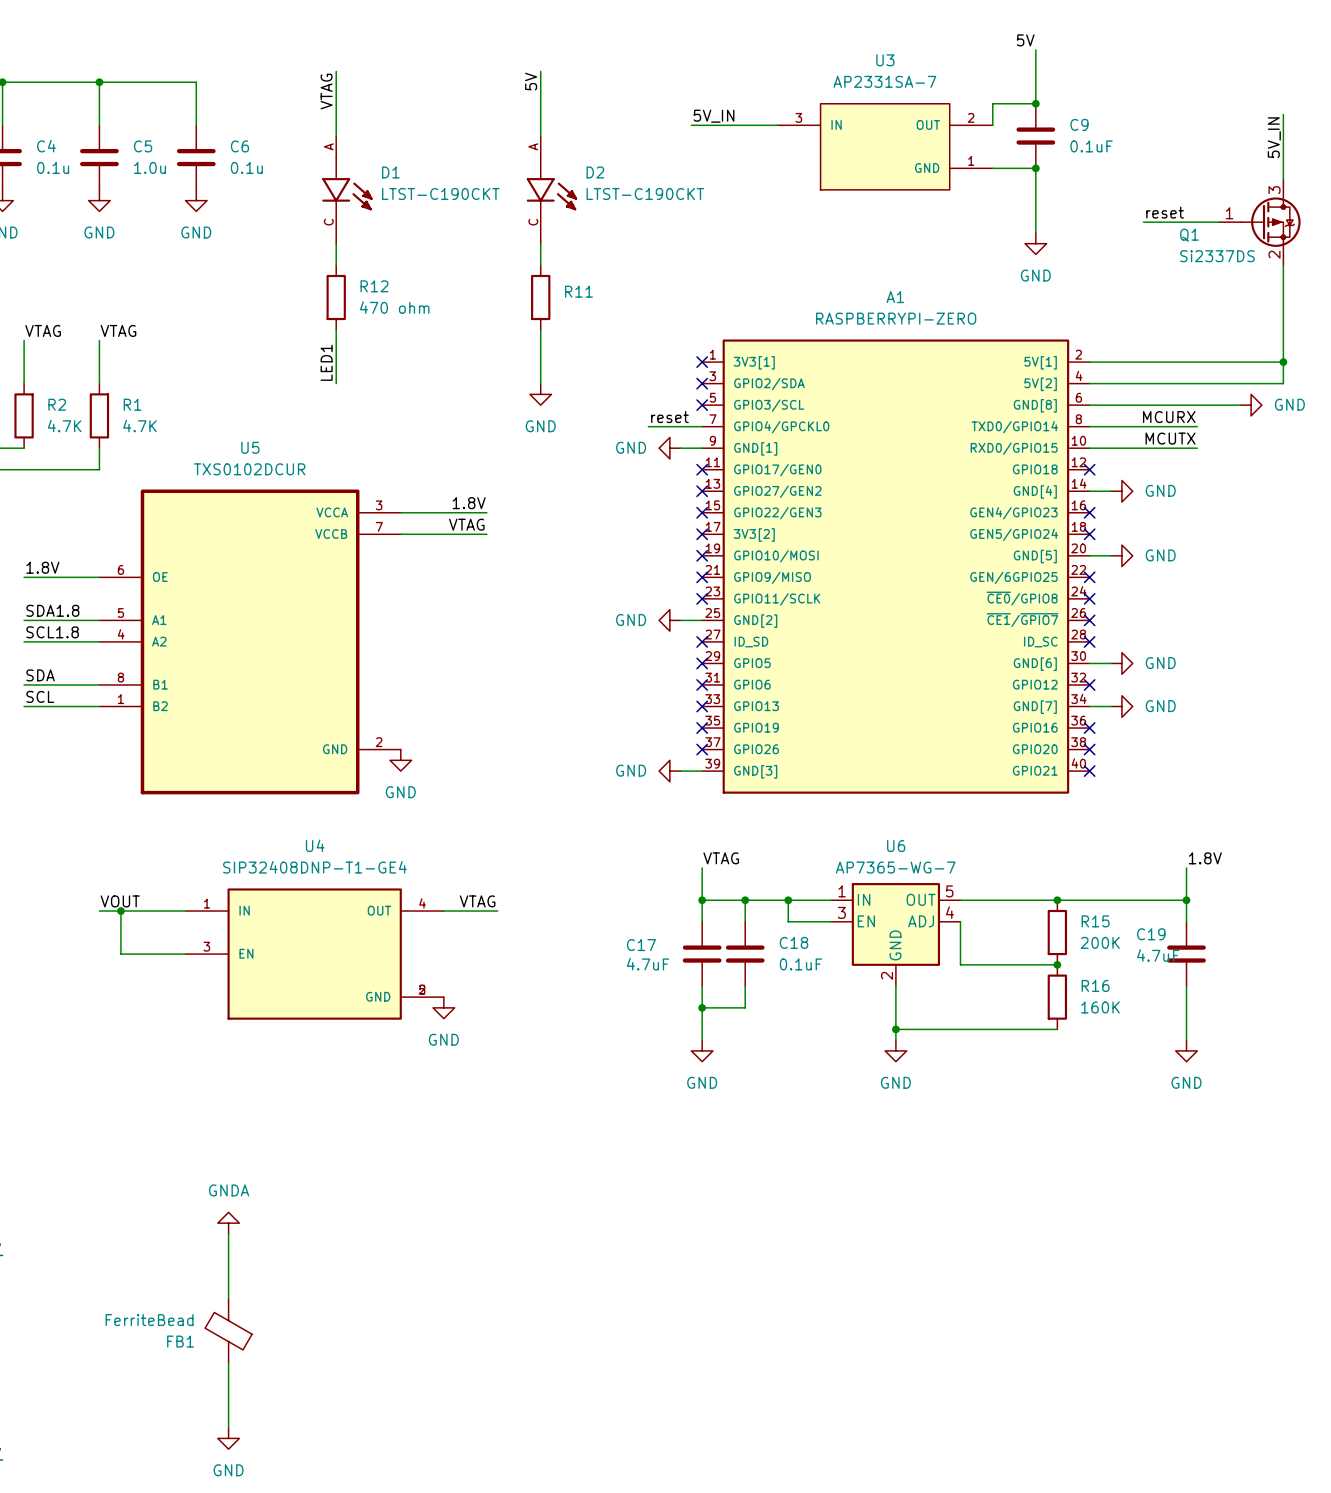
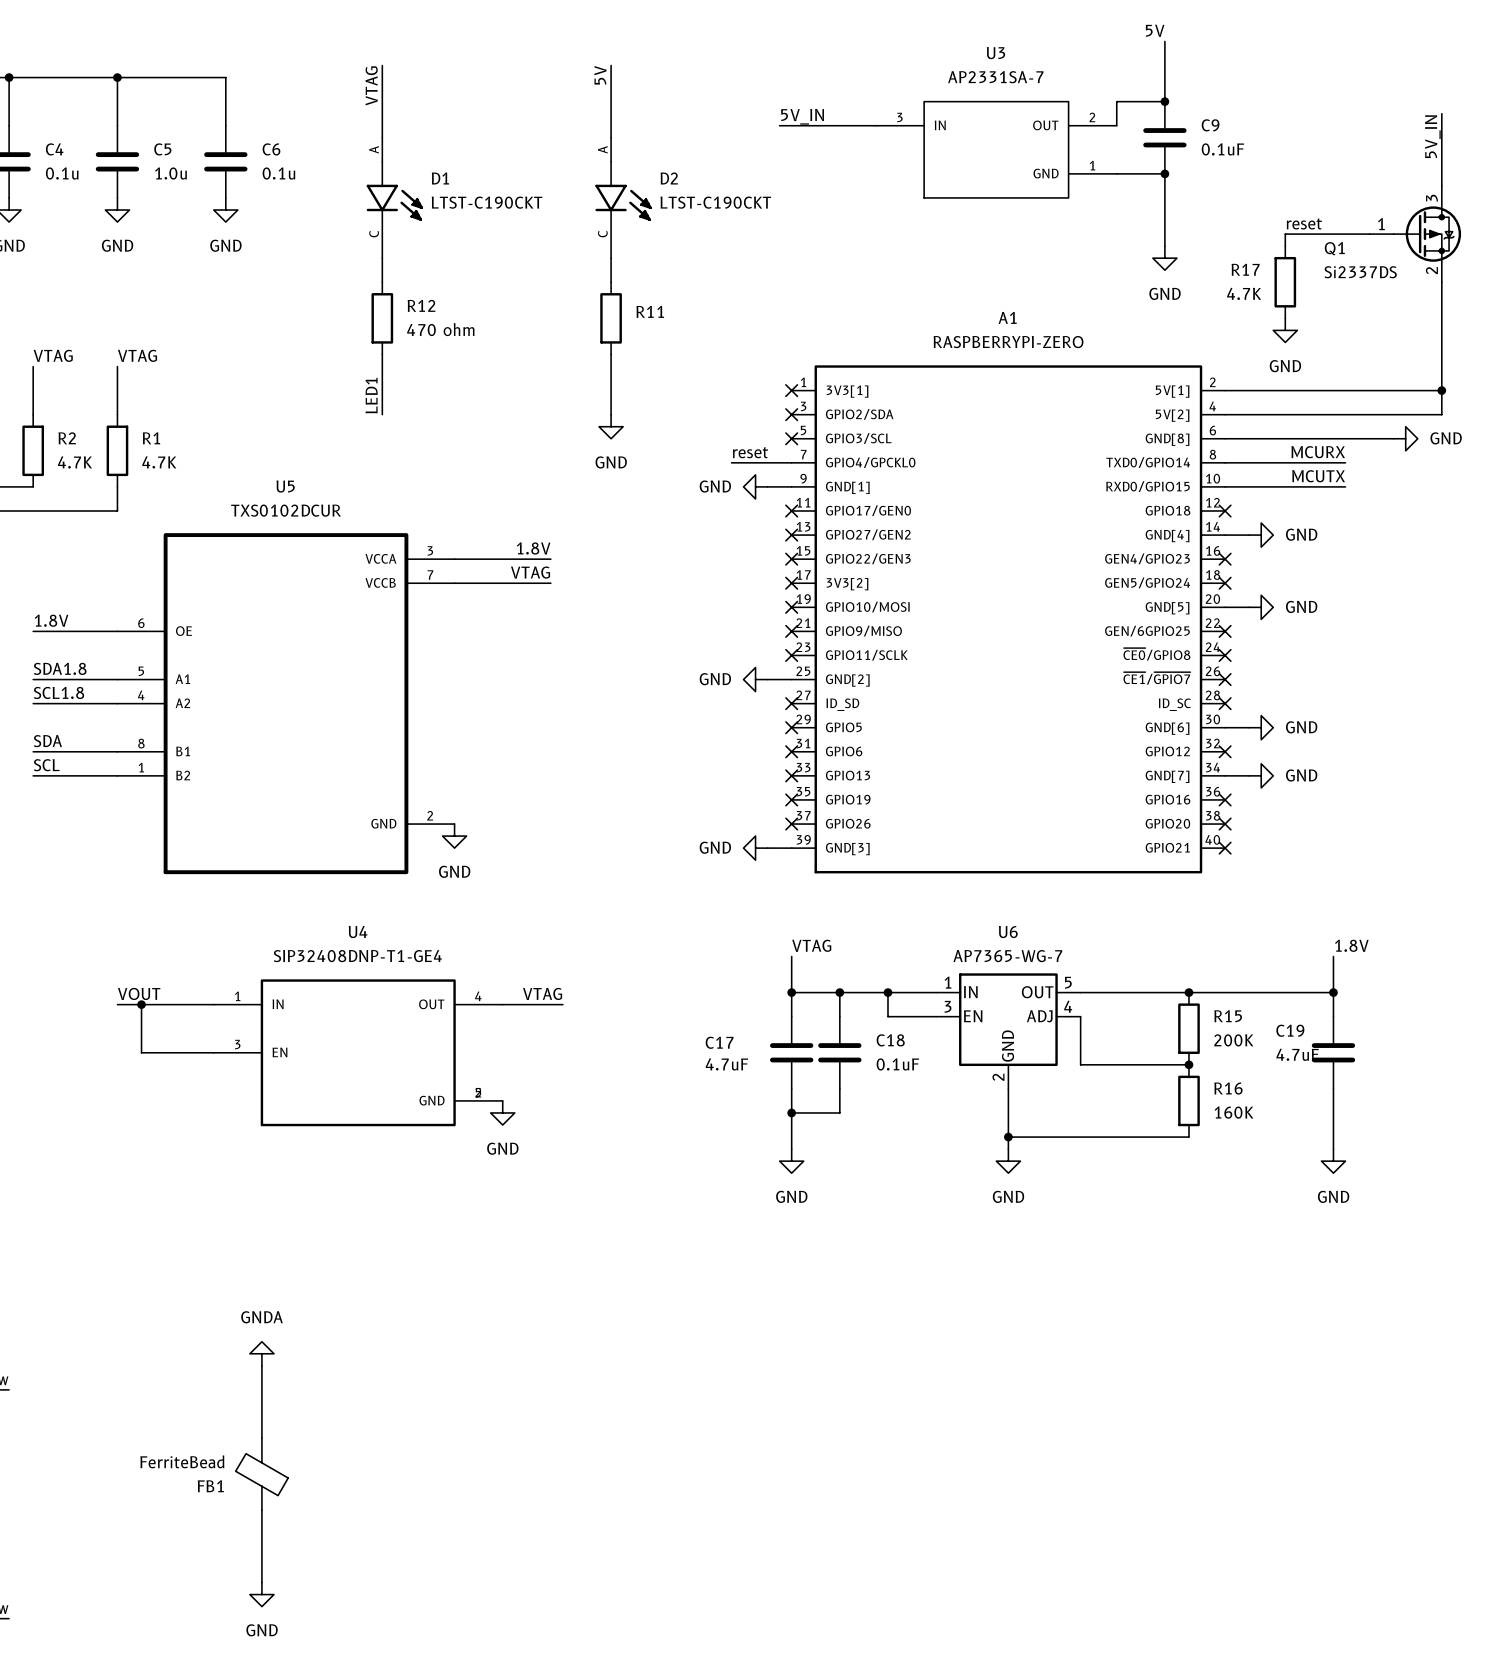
wire: none -> (1285, 234) (1285, 246)
R17: none -> 4.7K (1285, 282)
power symbol: none -> GND (1285, 330)

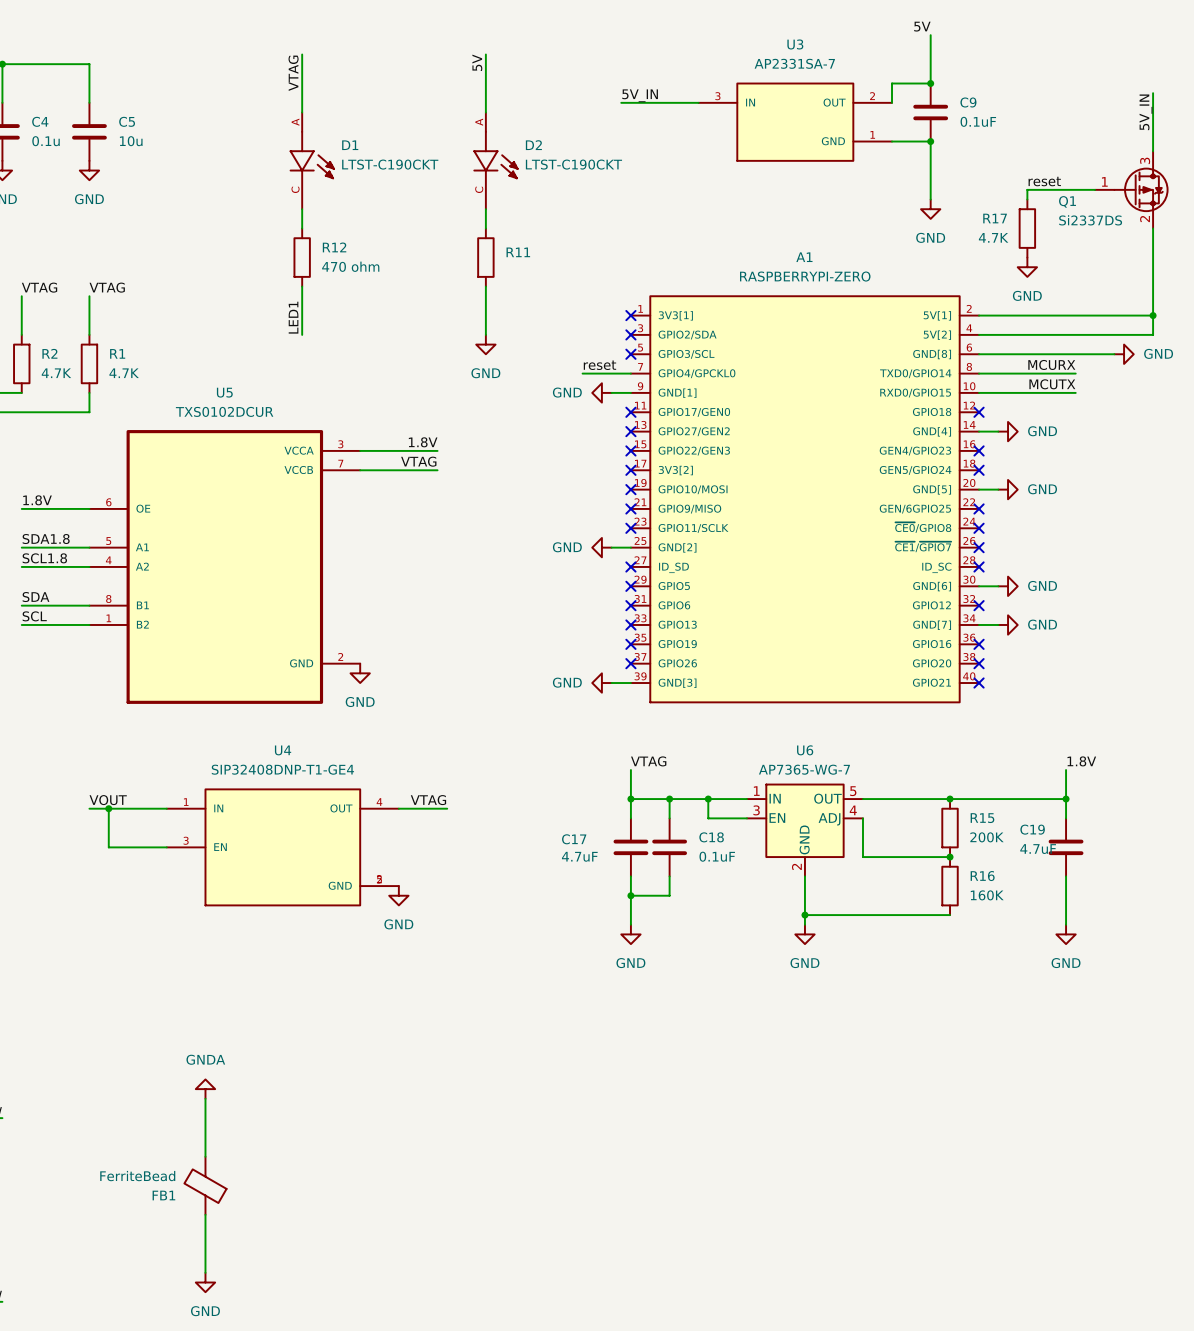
wire: (117, 77) (225, 77) (225, 125) -> none
junction: (117, 77) -> none
C6: 0.1u (225, 161) -> none
C5 value: 1.0u (170, 173) -> 10u (131, 141)
power symbol: GND (225, 210) -> none

